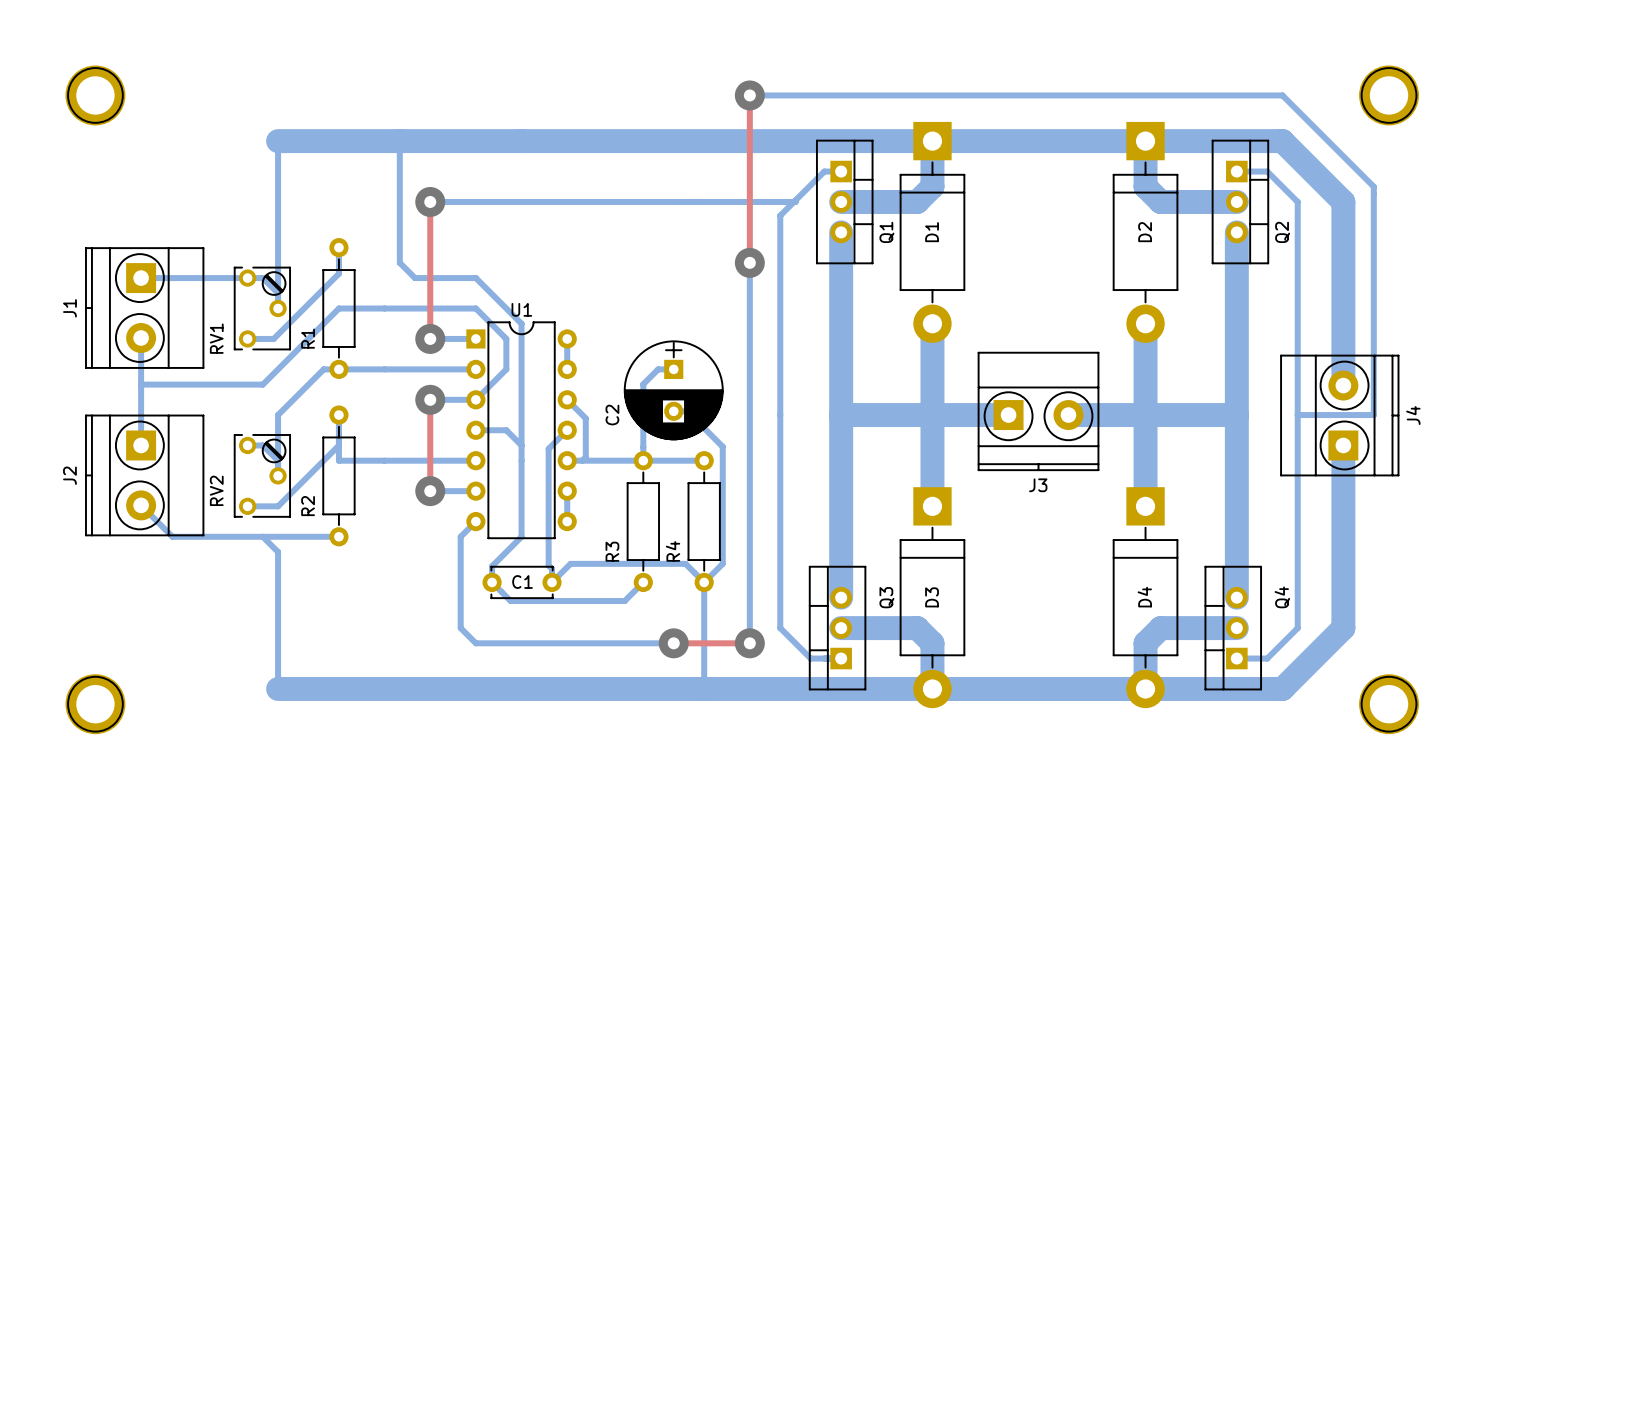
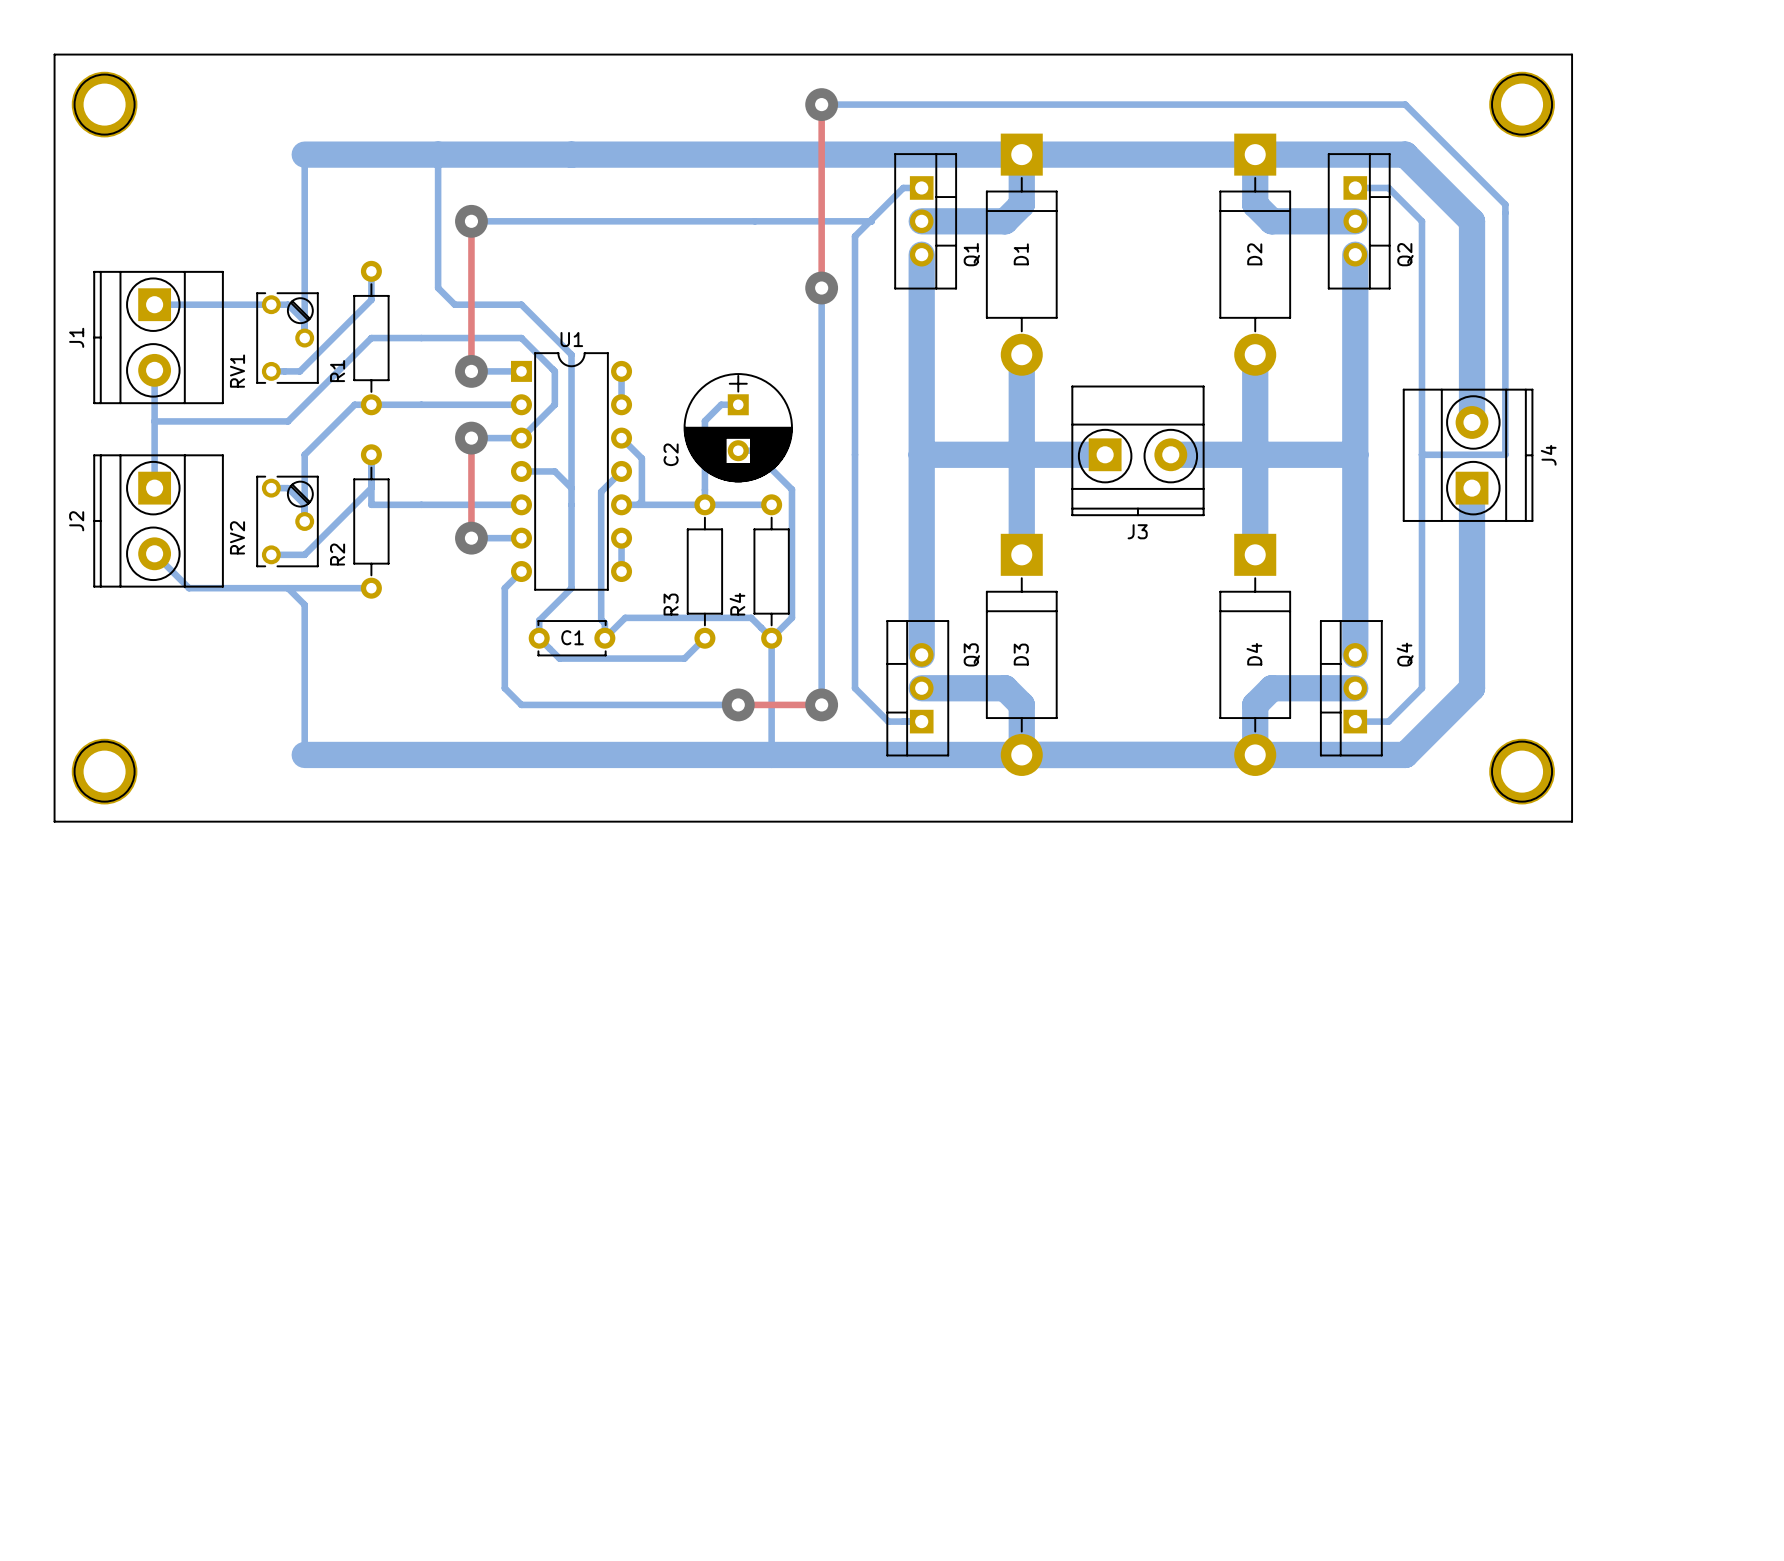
board edge: none -> (54, 54) (1572, 54) (1572, 821) (54, 821) (54, 54)

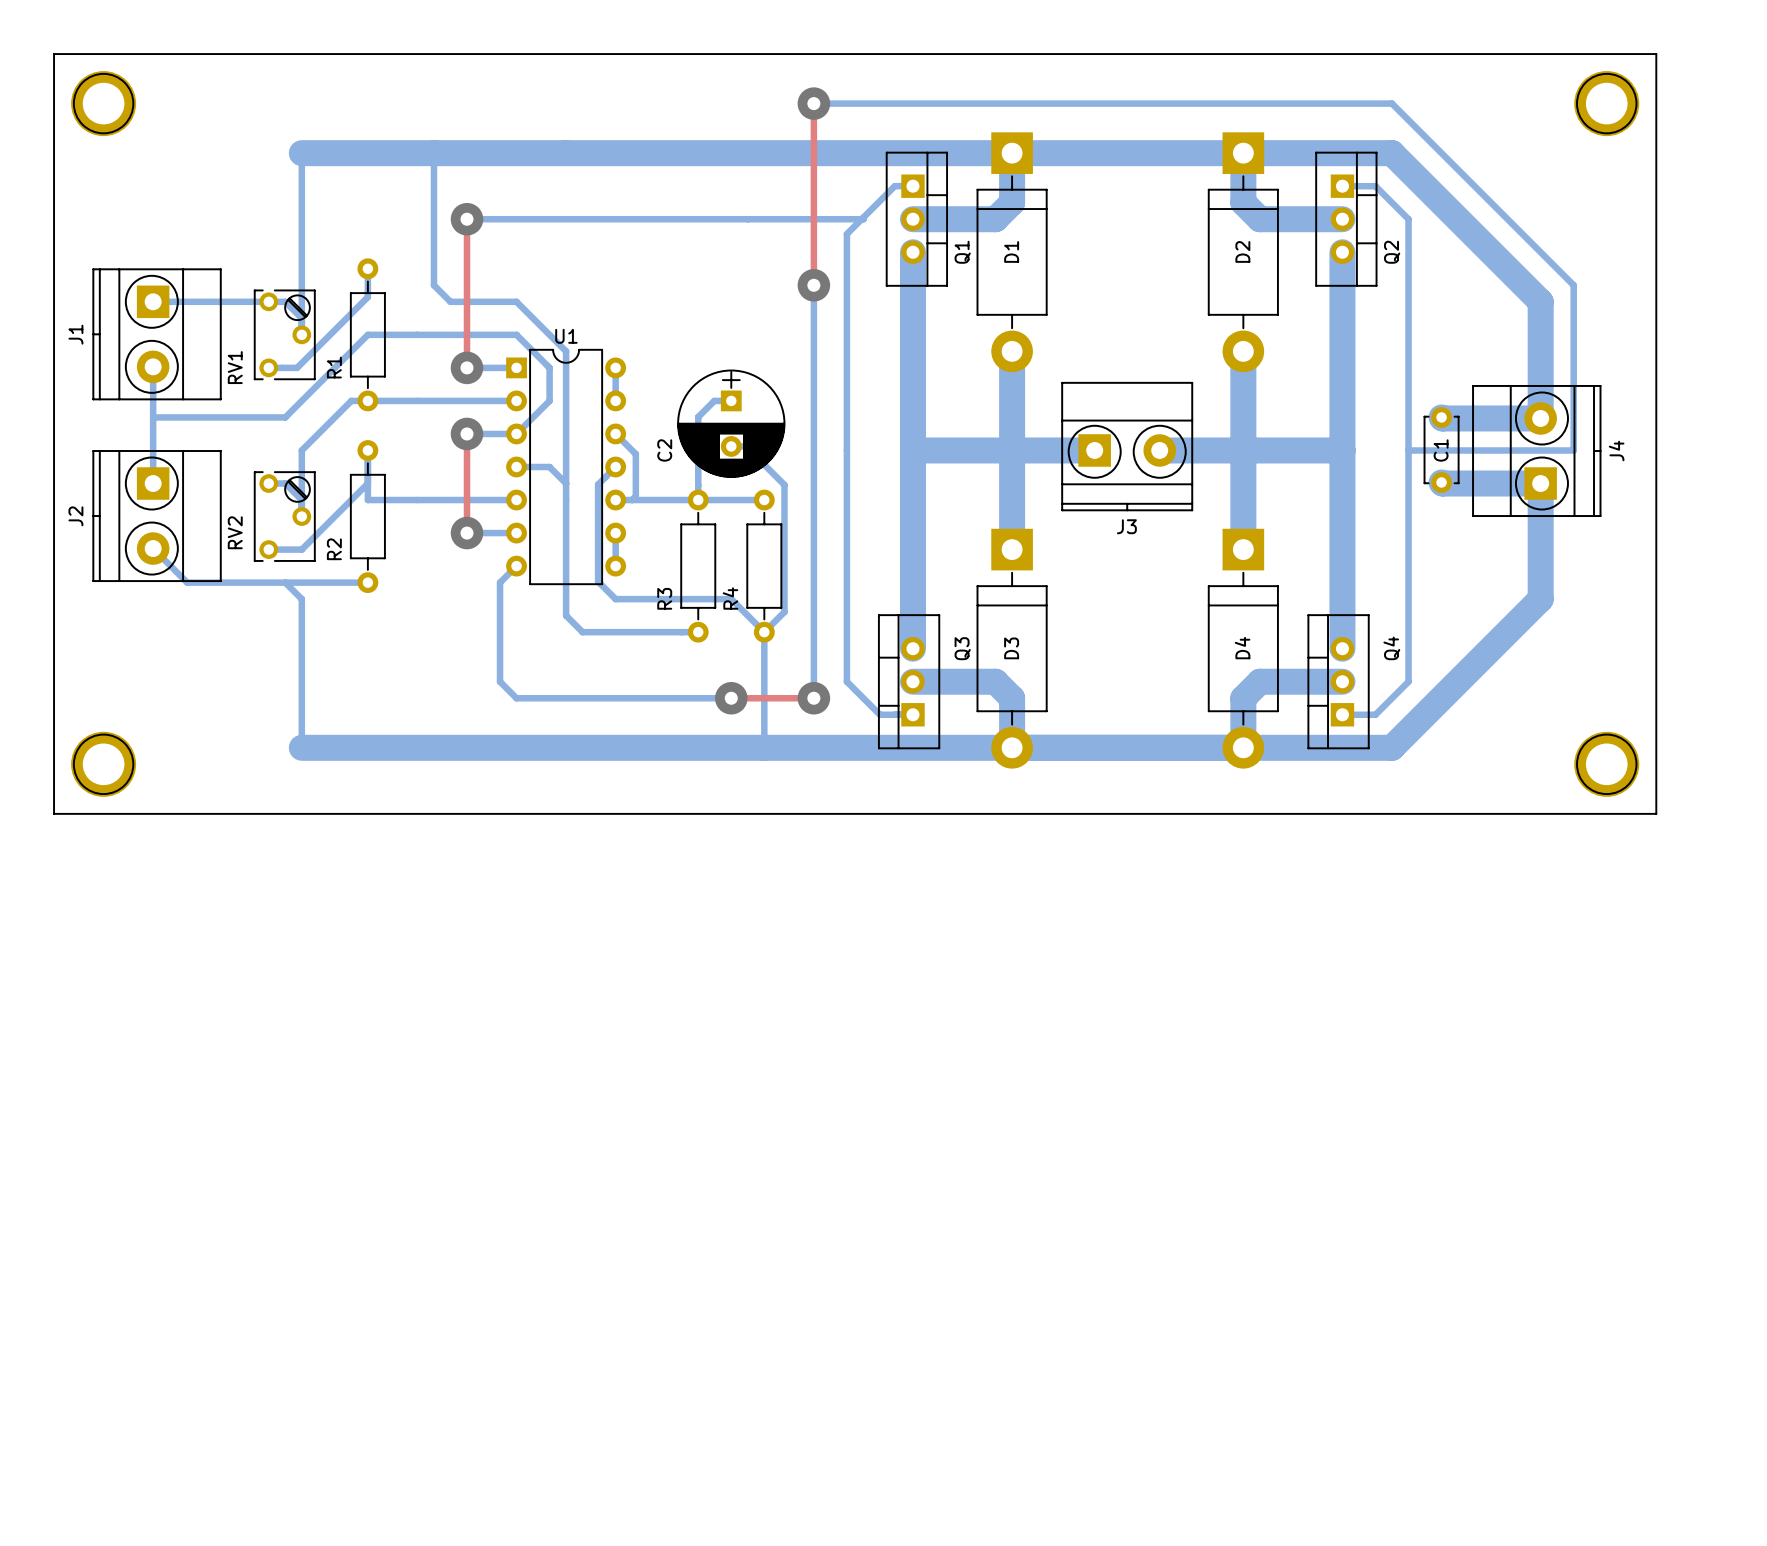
board edge: (1572, 54) (1572, 821) -> (1557, 54) (1656, 54) (1656, 813) (1557, 813)
part position: (1522, 104) -> (1606, 103)
bottom track: (1505, 204) (1505, 454) -> (1491, 202) (1573, 285) (1573, 450) (1491, 450)
bottom track: (1472, 221) (1472, 422) -> (1458, 219) (1540, 301) (1540, 417)
bottom track: none -> (1441, 417) (1540, 418)
J4 position: (1468, 455) -> (1536, 451)
bottom track: (1472, 488) (1472, 688) -> (1441, 482) (1540, 483) (1540, 599) (1458, 681)
bottom track: (603, 489) (601, 491) (601, 619) (604, 623) (604, 638) (625, 617) (751, 617) -> (598, 484) (598, 581) (615, 599) (731, 599) (744, 612)
bottom track: (571, 588) (539, 620) (539, 638) (559, 658) (684, 658) (704, 638) -> (566, 582) (566, 615) (582, 632) (698, 632)
C1 rotation: 0° (572, 638) -> 90° clockwise (1441, 449)
C1 position: (572, 638) -> (1441, 449)
part position: (1522, 771) -> (1606, 764)

